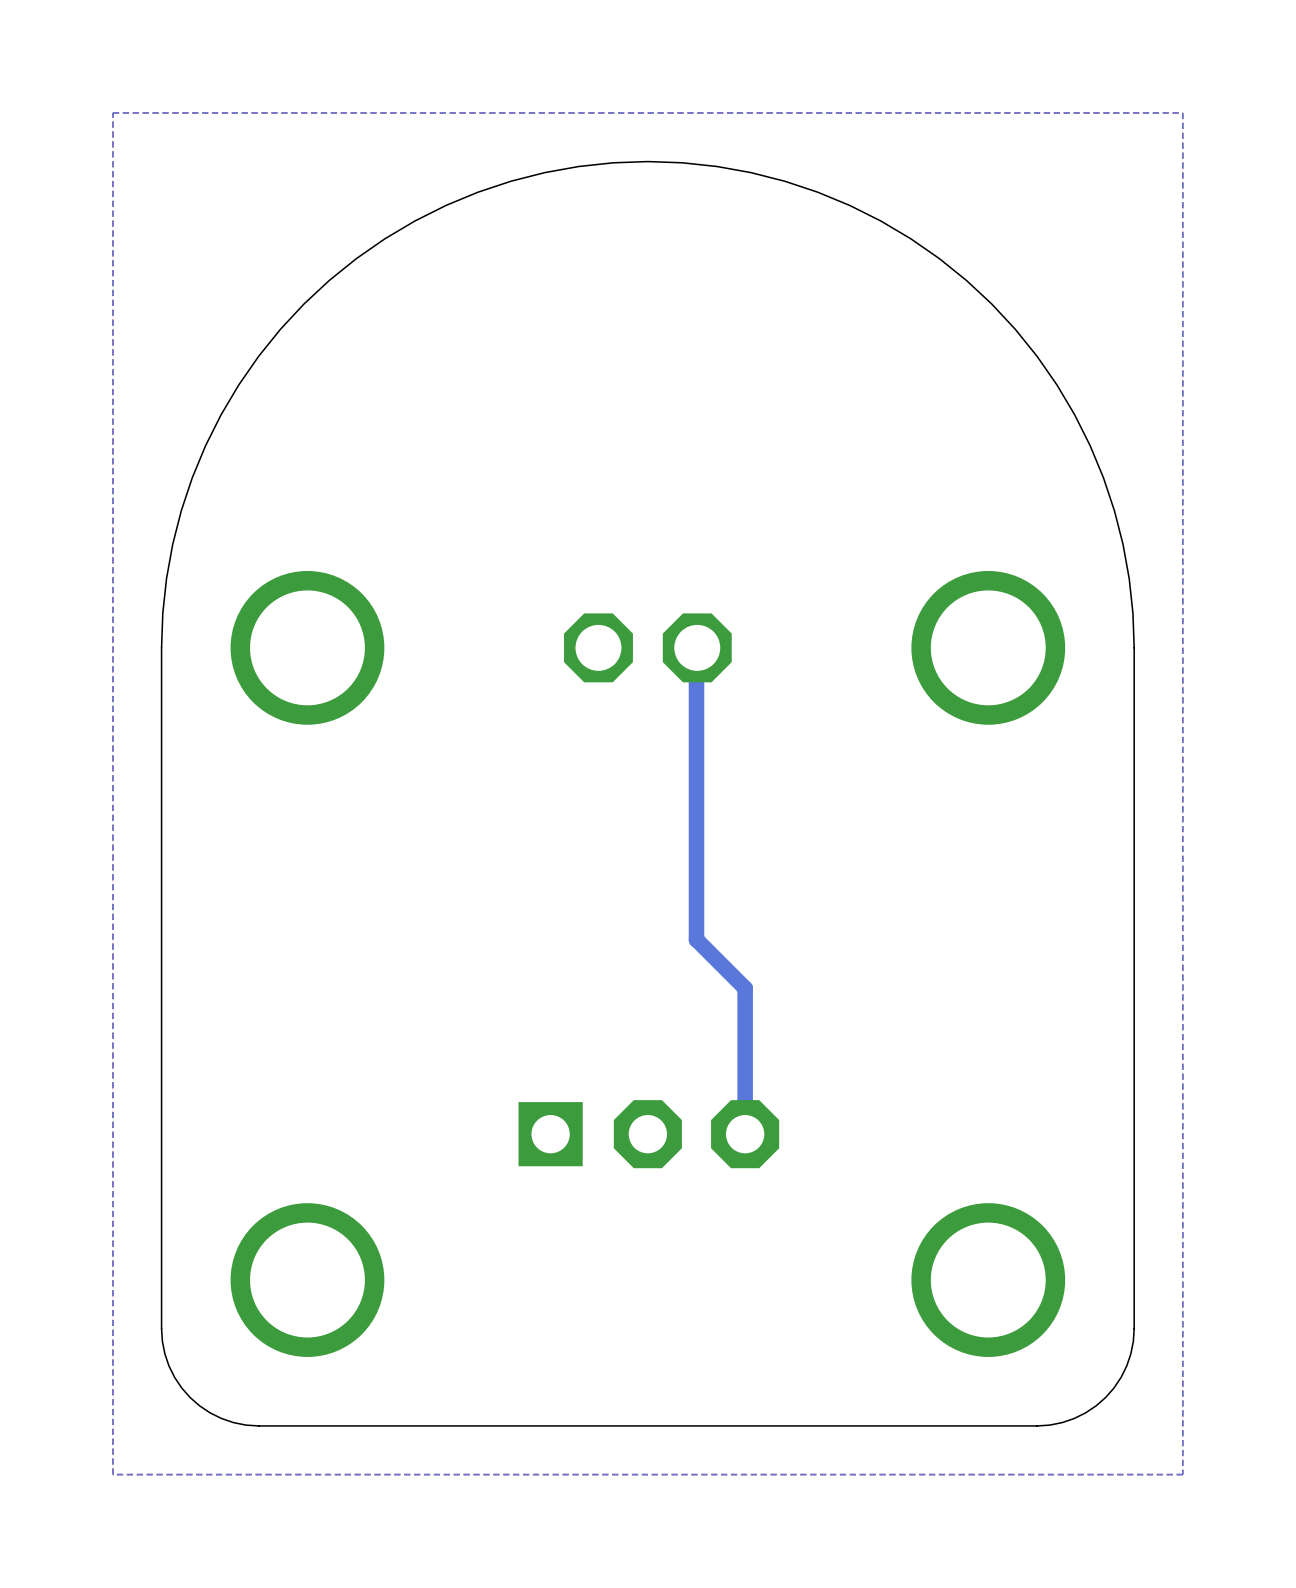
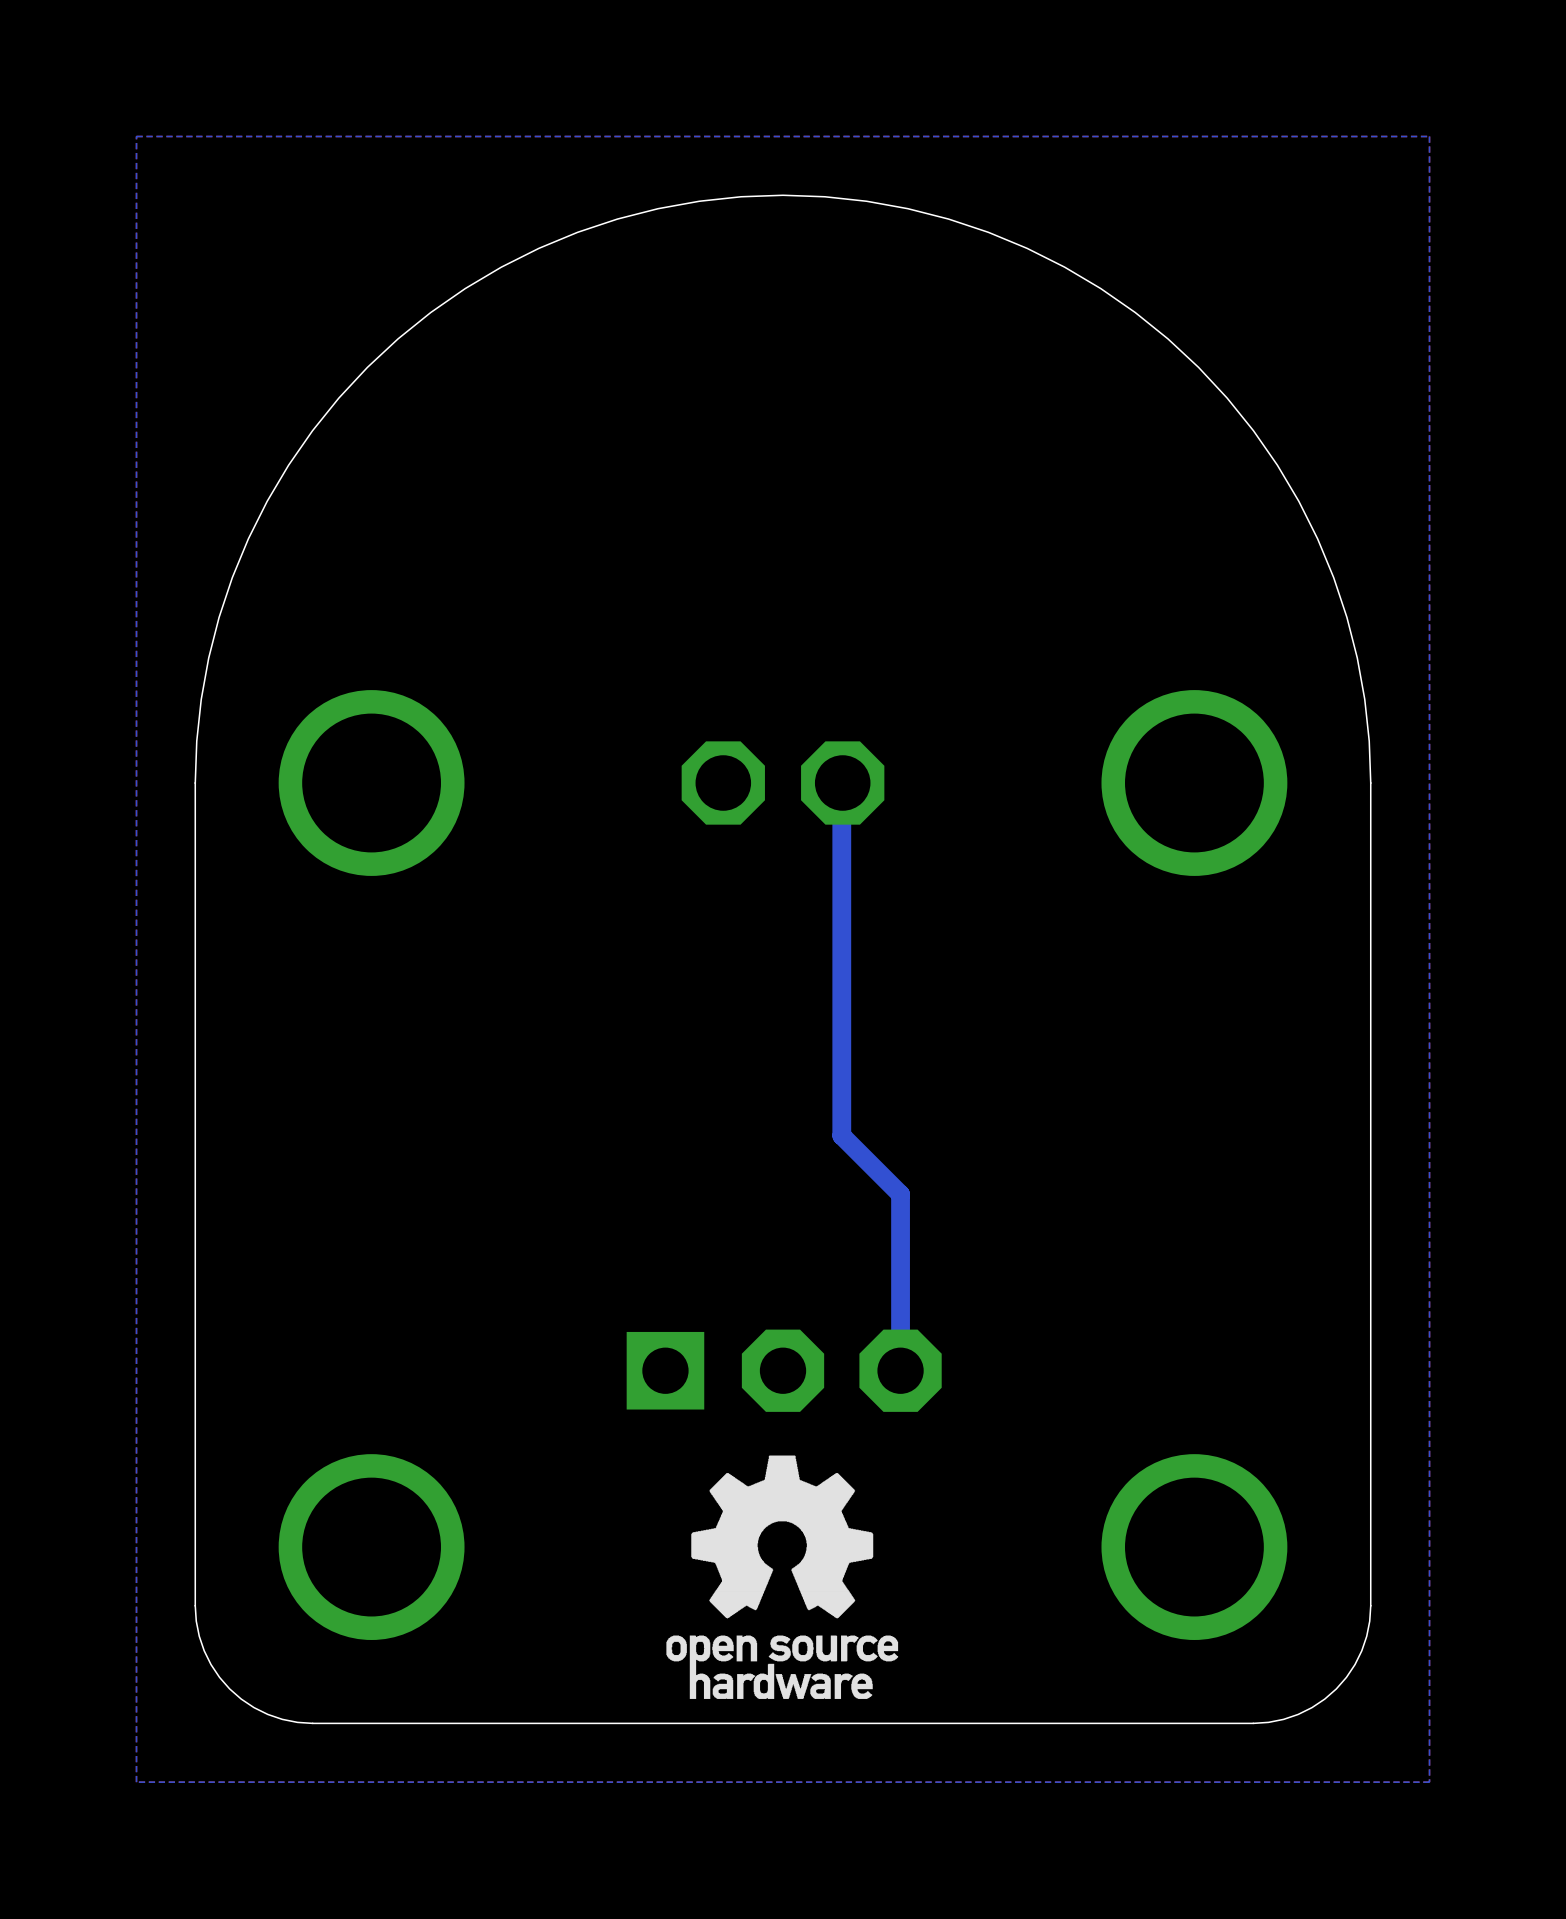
drawing: none -> [666, 1455, 899, 1699]

